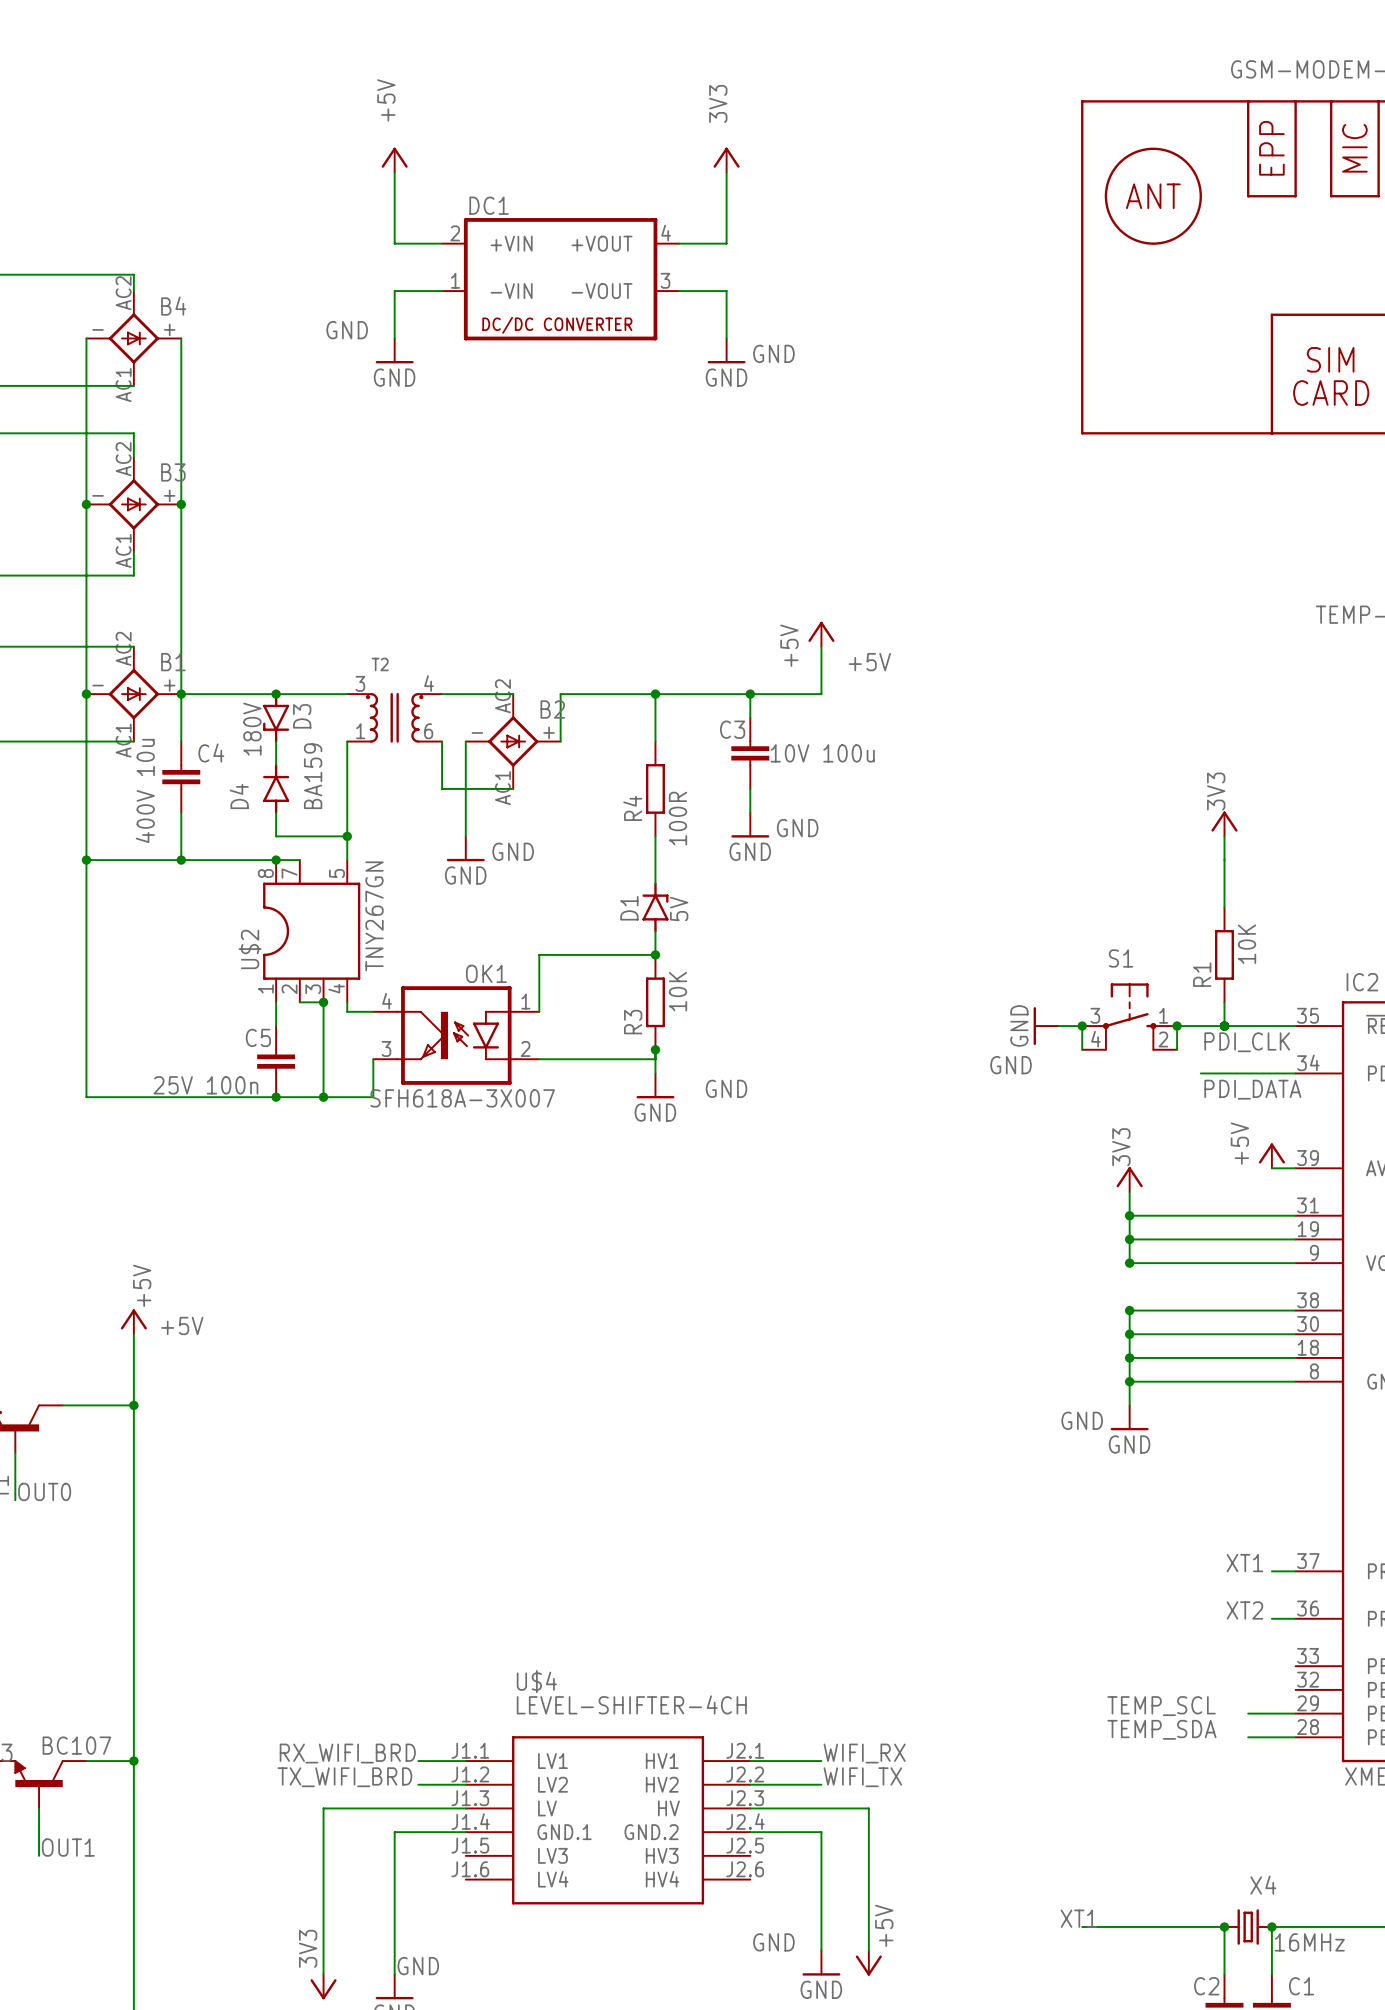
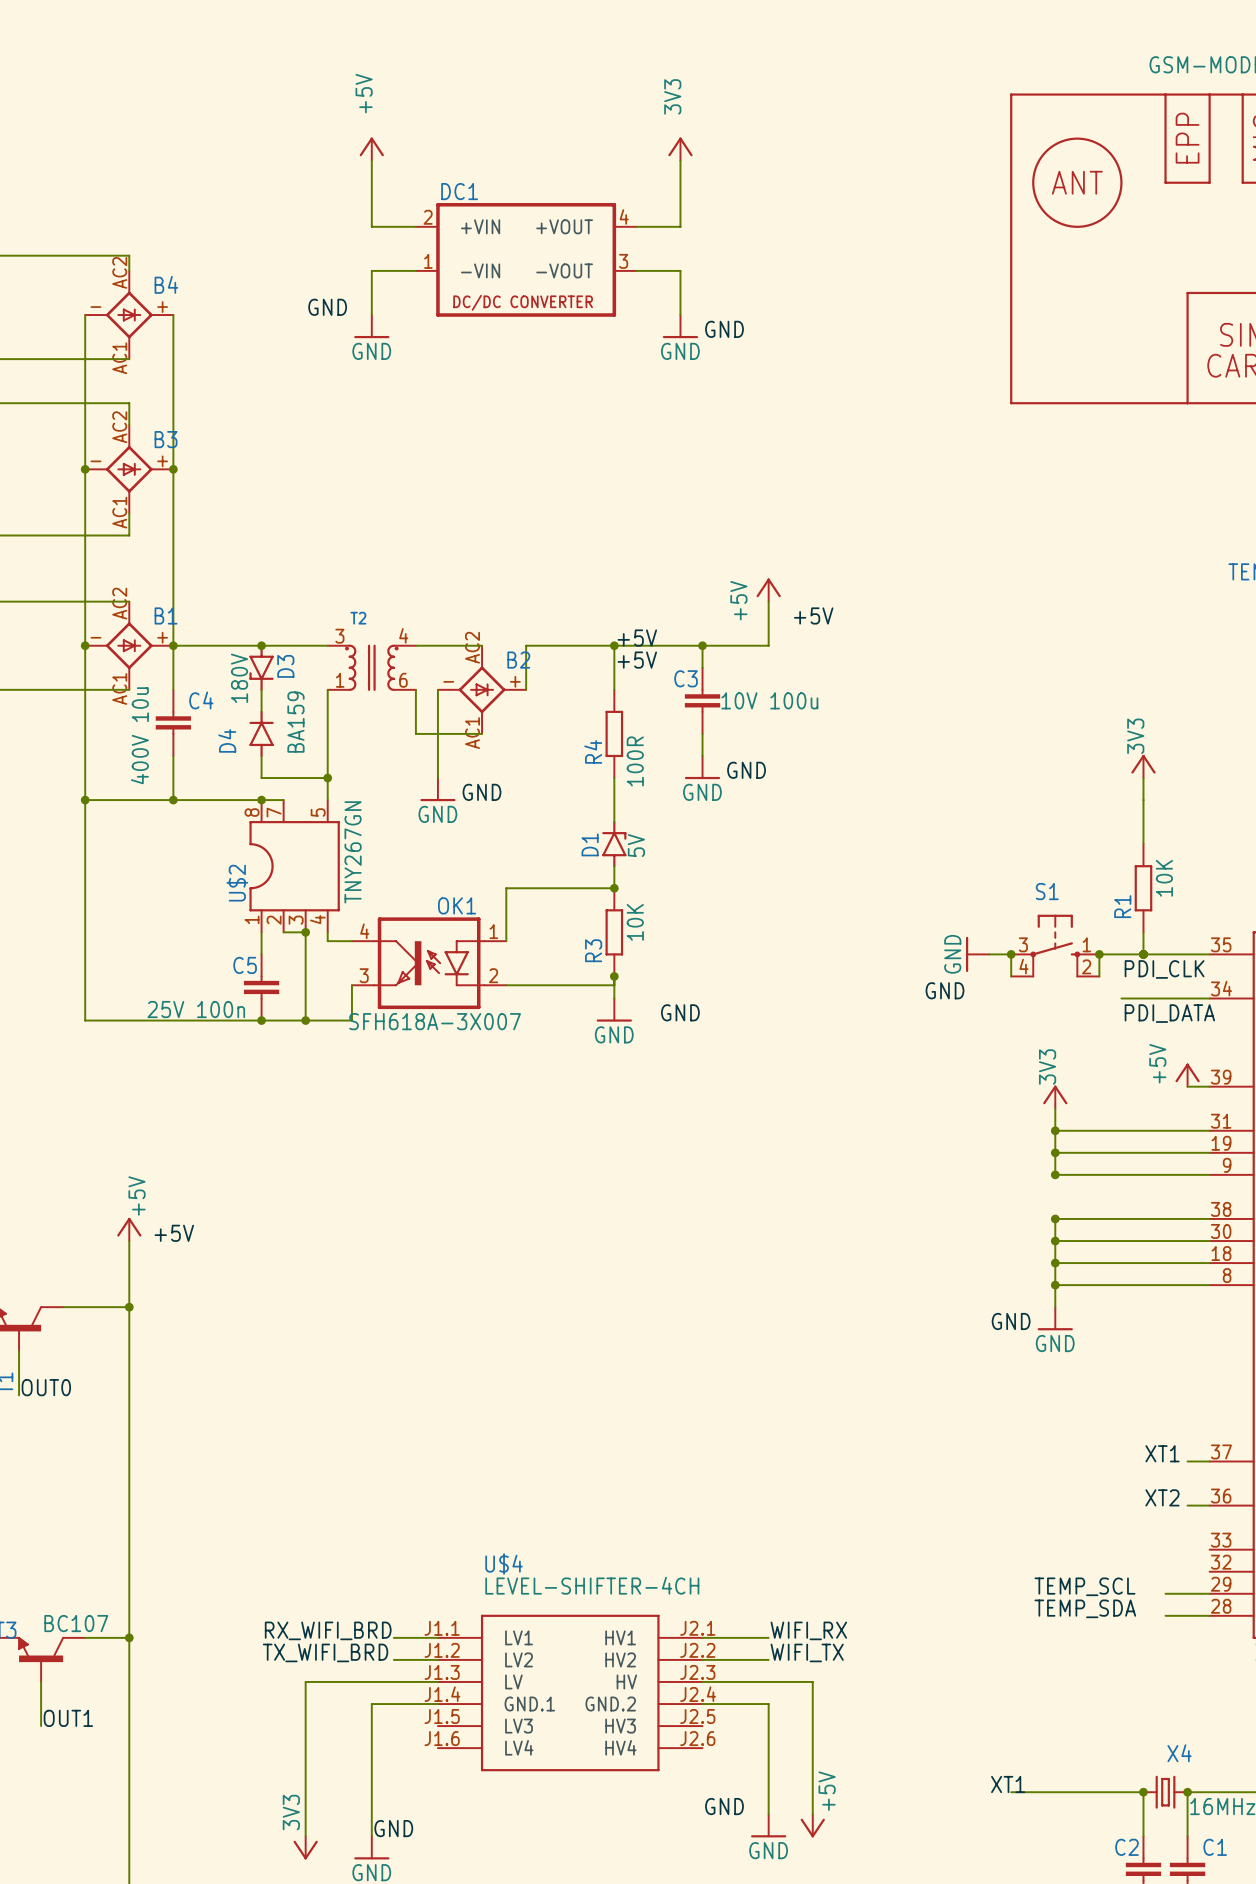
label: none -> +5V (637, 638)
label: none -> +5V (637, 660)

